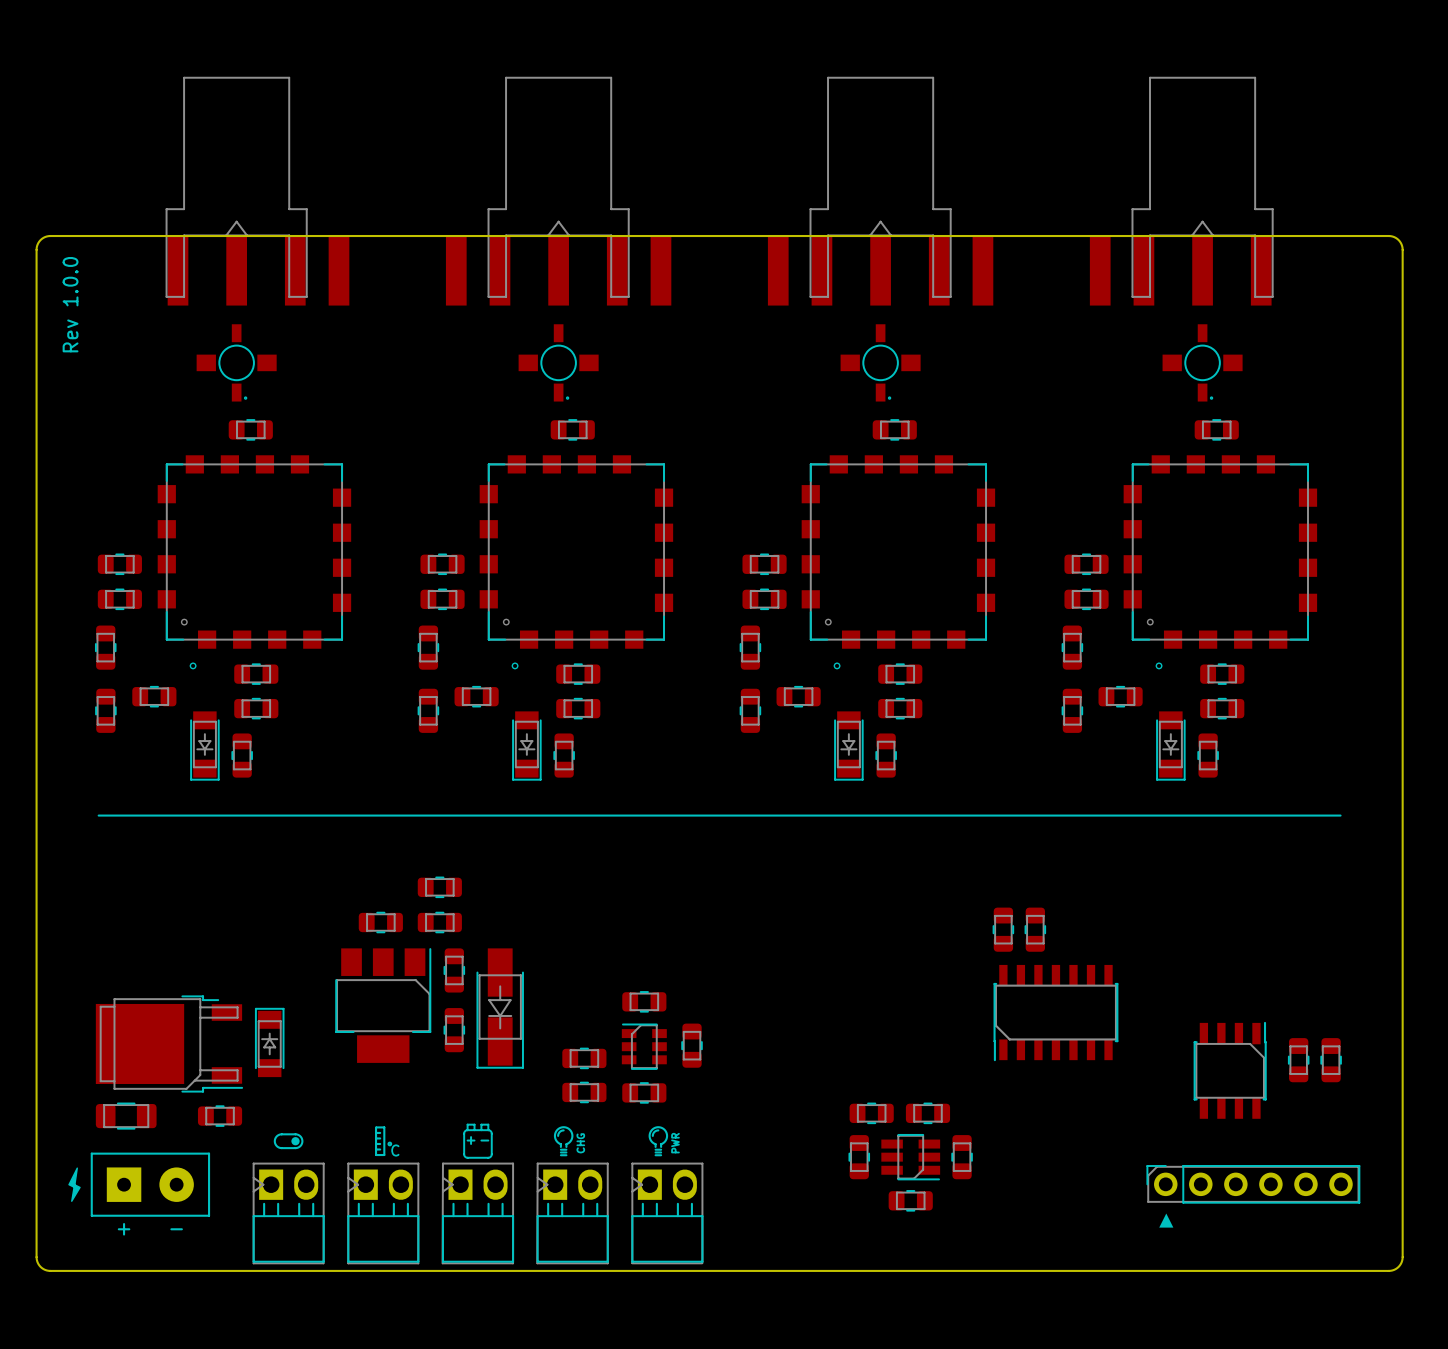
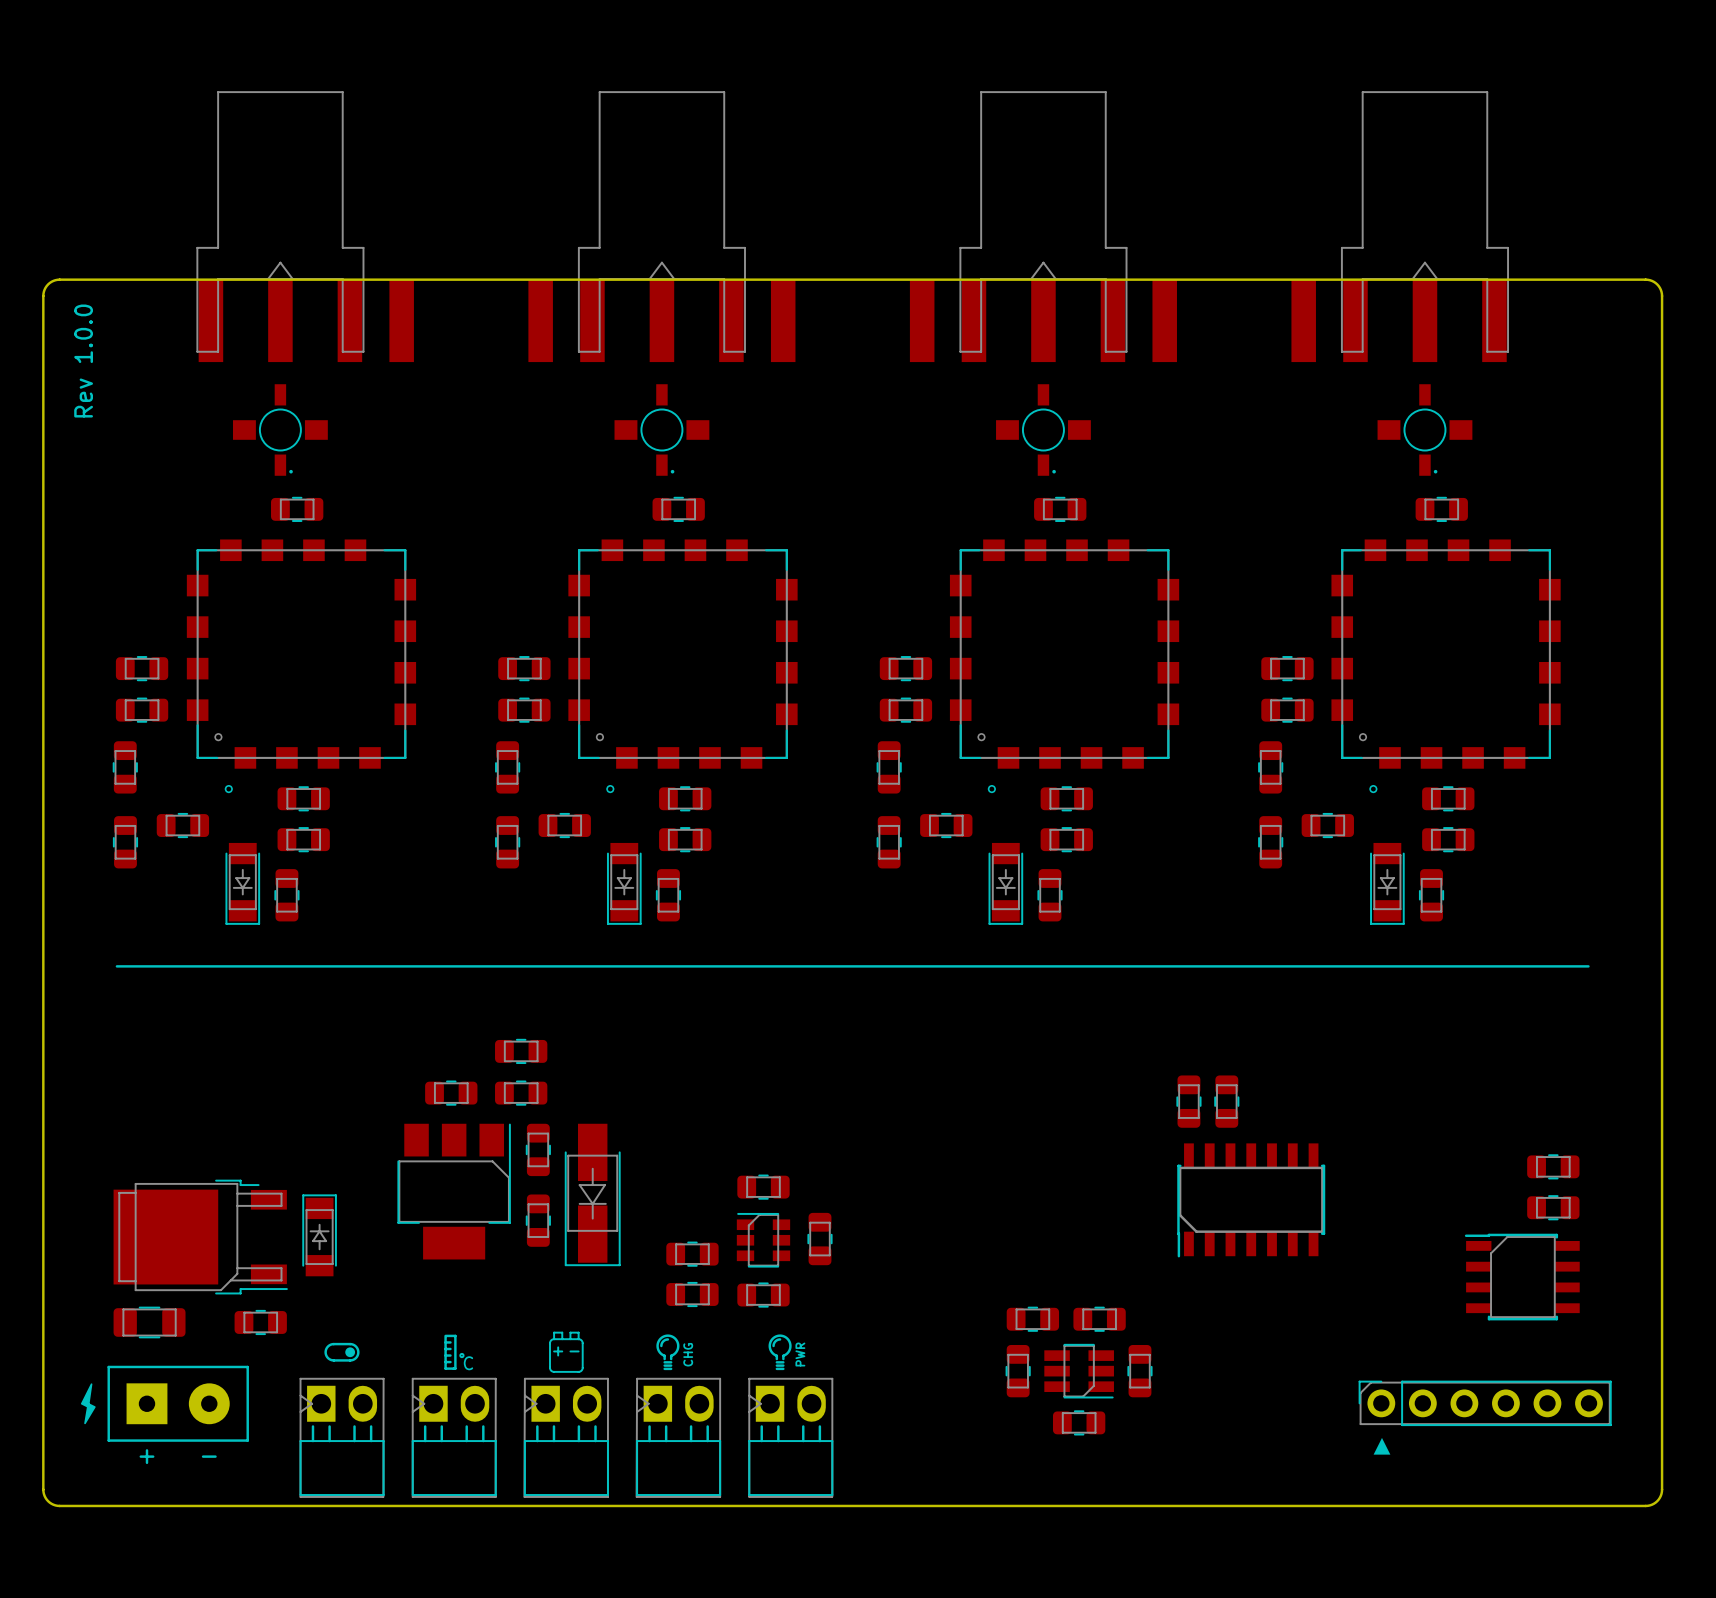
part: none -> (1553, 1166)
part: none -> (1553, 1207)
part: (1298, 1060) -> none
part: (1331, 1060) -> none
part rotation: 0° (1230, 1070) -> 90° counterclockwise (1522, 1277)

